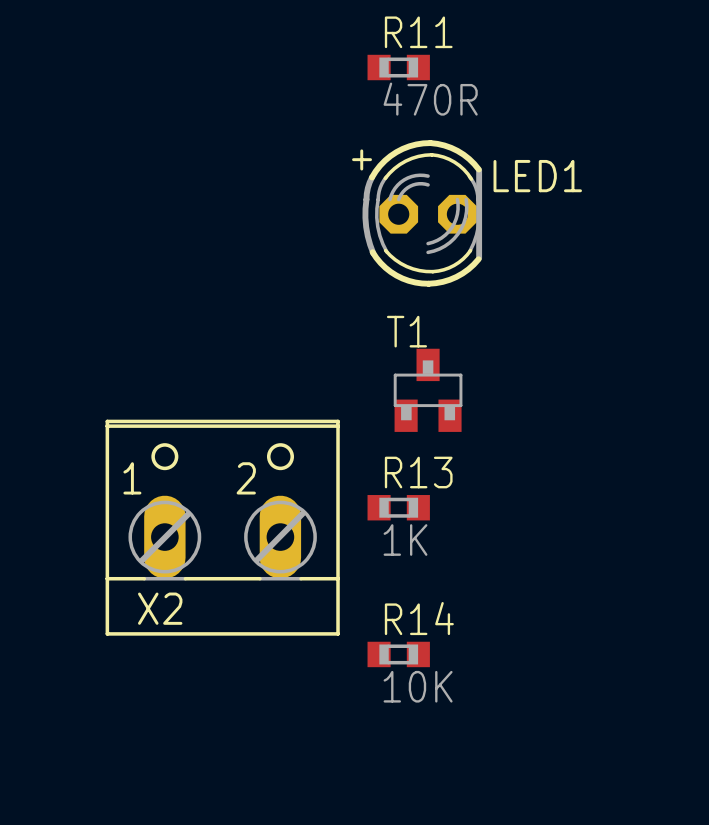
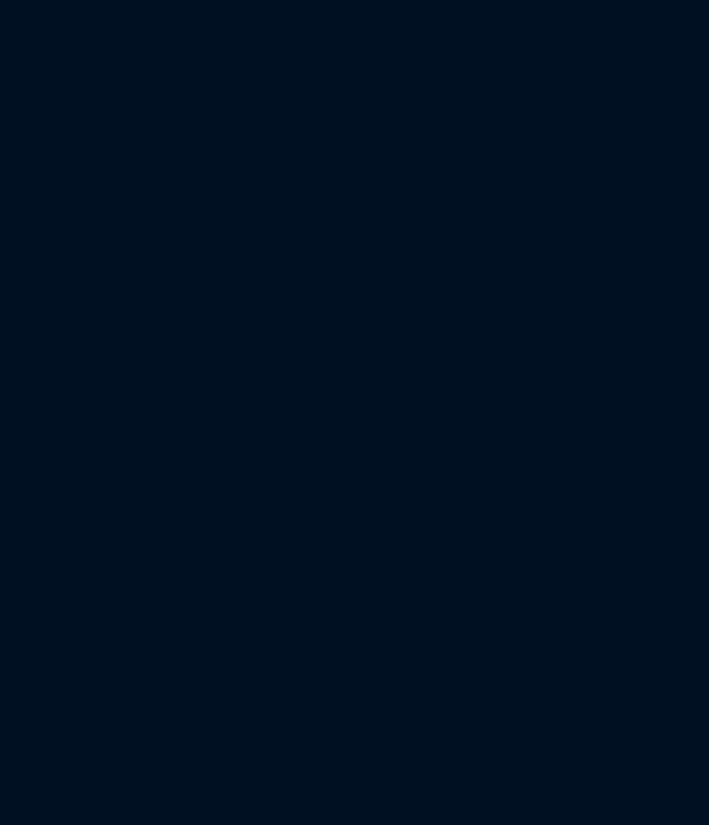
R11: 470R (398, 67) -> none
LED1: (417, 213) -> none
T1: (428, 390) -> none
R13: 1K (398, 507) -> none
X2: (222, 527) -> none
R14: 10K (398, 654) -> none

